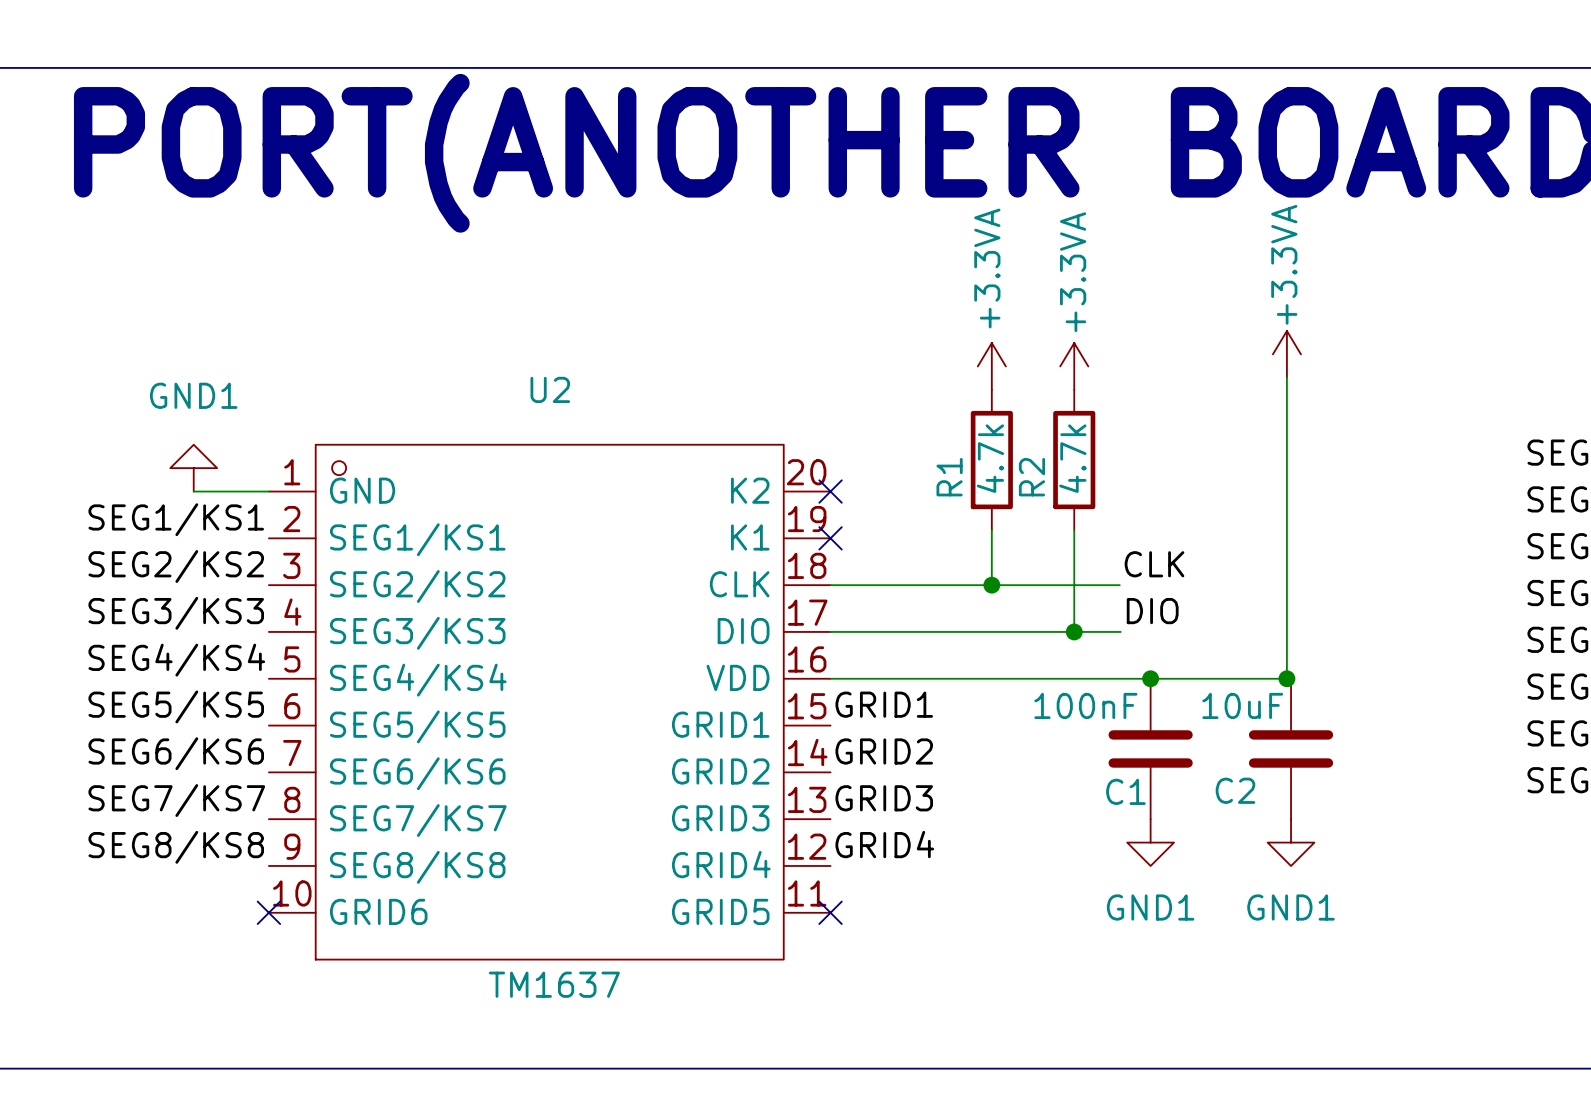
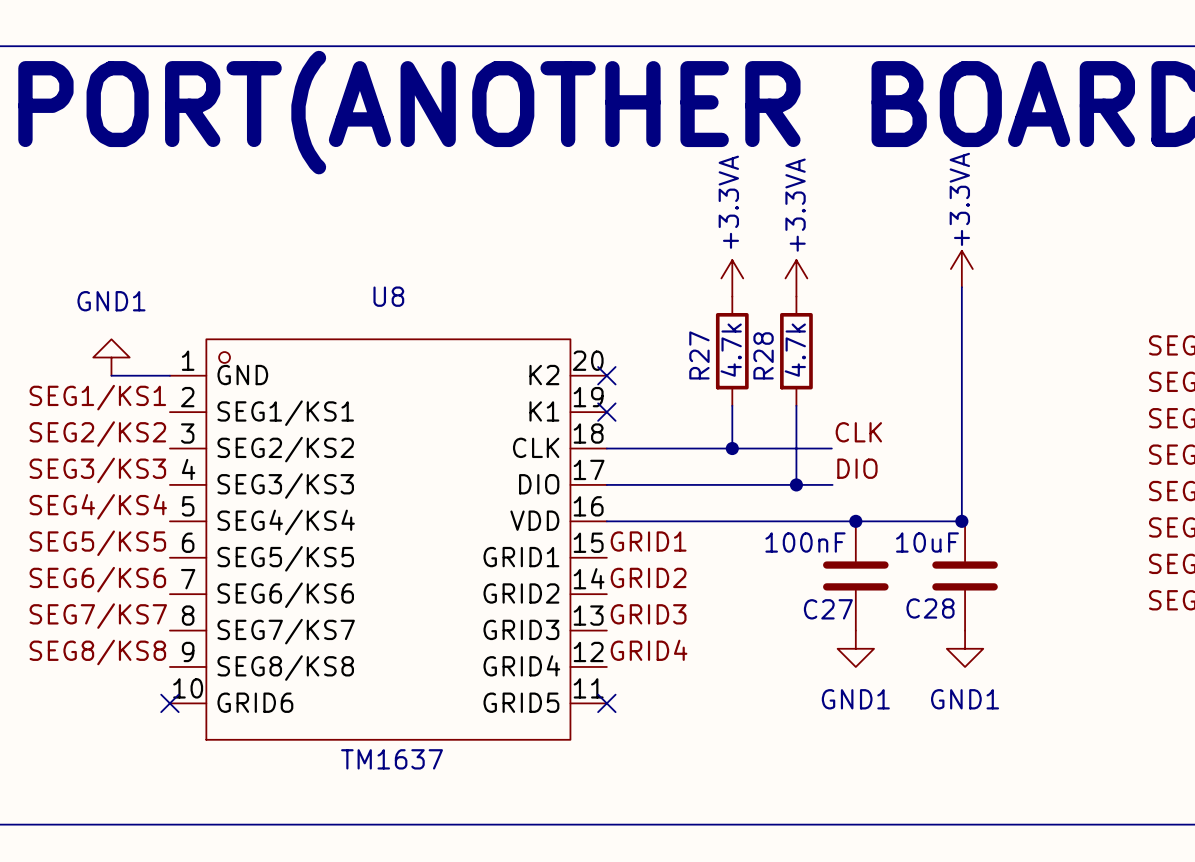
U2 name: U2 (550, 389) -> U8 (388, 296)
R1 name: R1 (949, 477) -> R27 (699, 355)
R2 name: R2 (1031, 477) -> R28 (763, 355)
C2 name: C2 (1235, 790) -> C28 (930, 608)
C1 name: C1 (1125, 791) -> C27 (828, 609)

